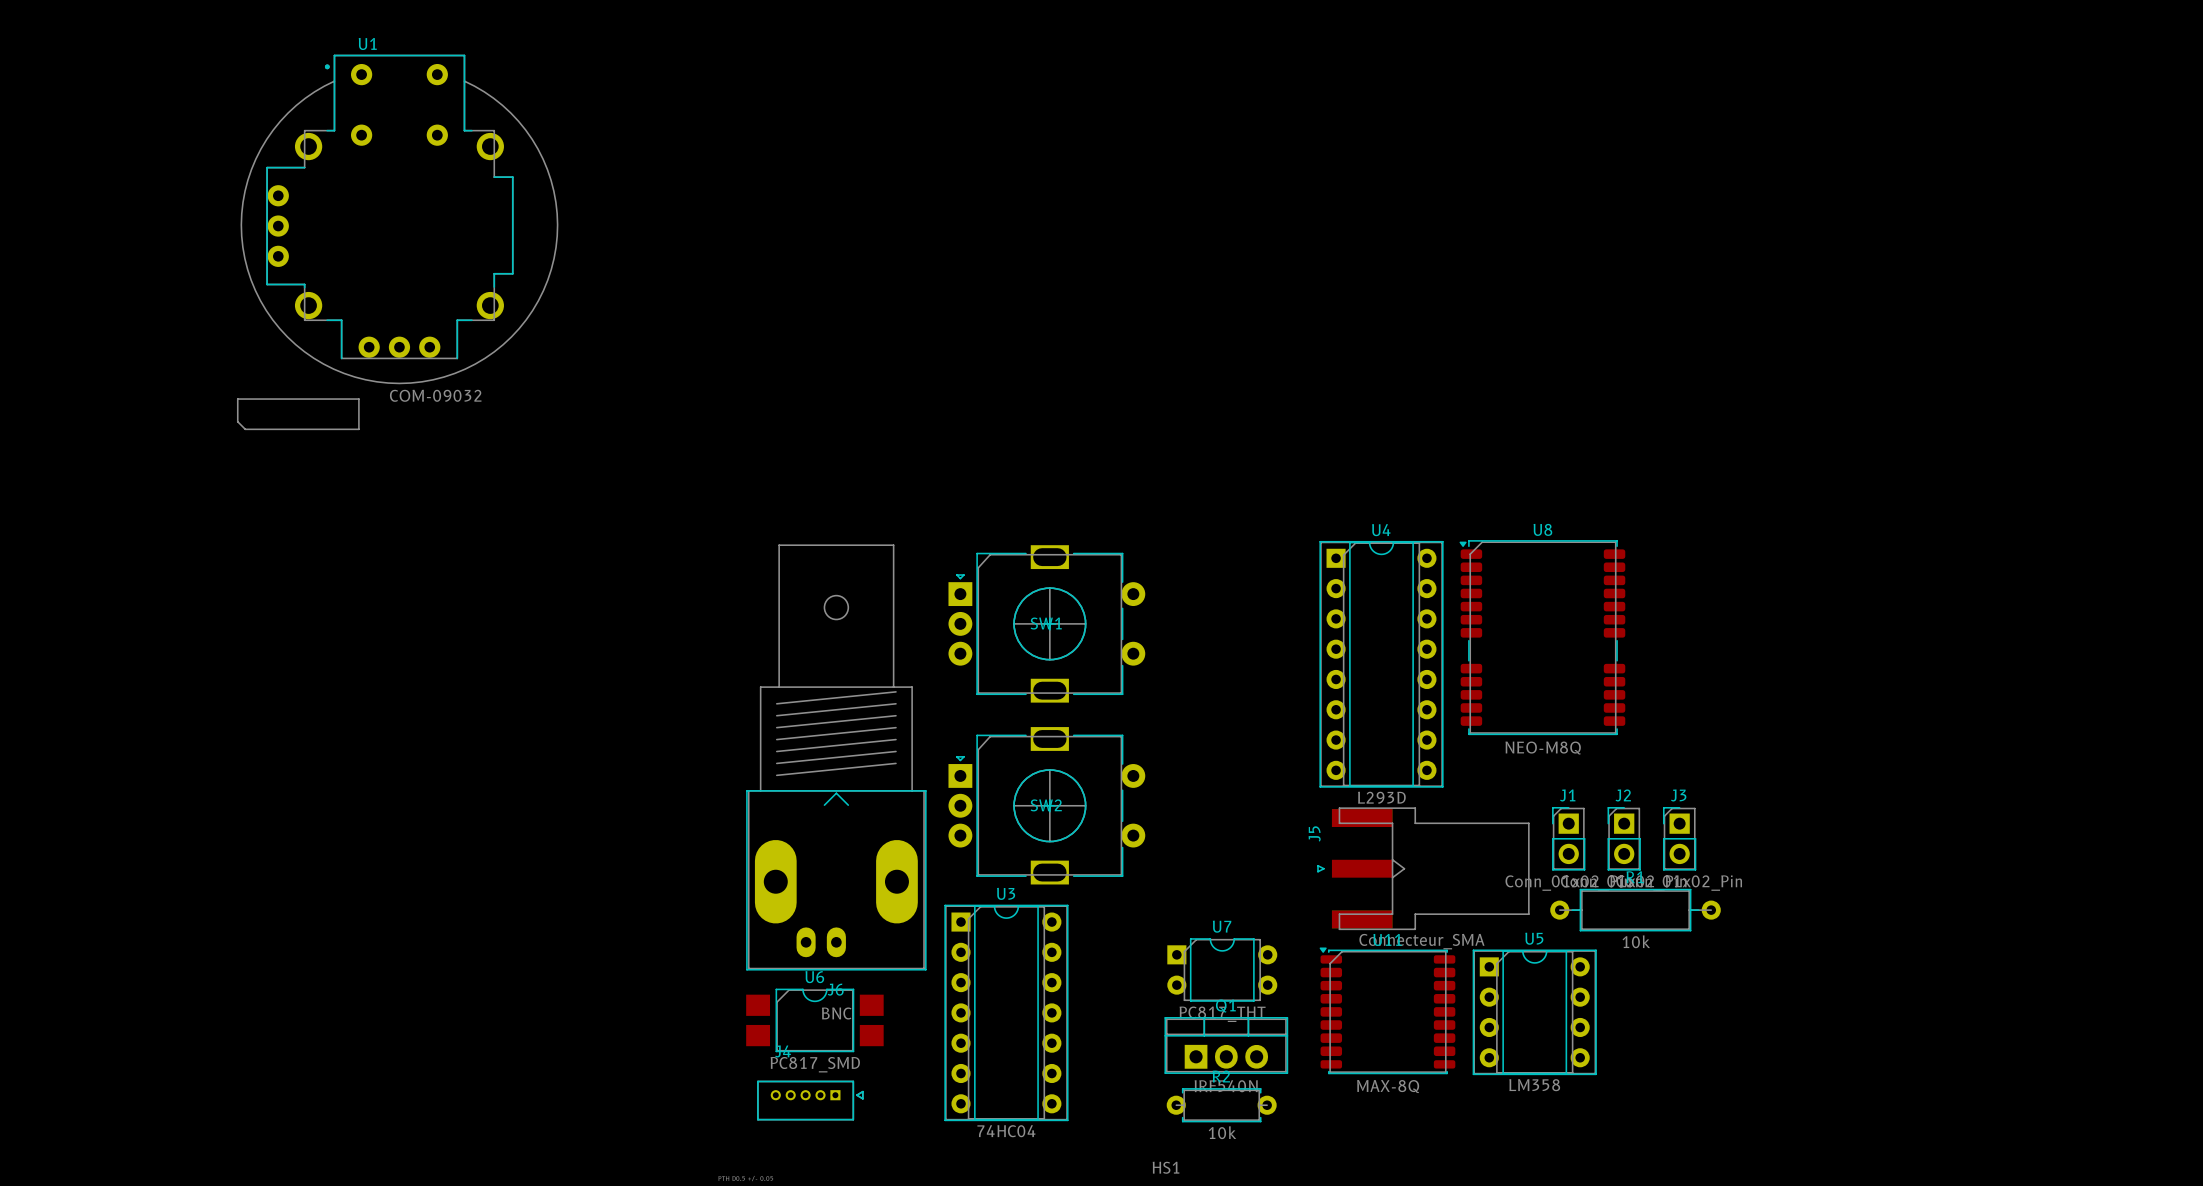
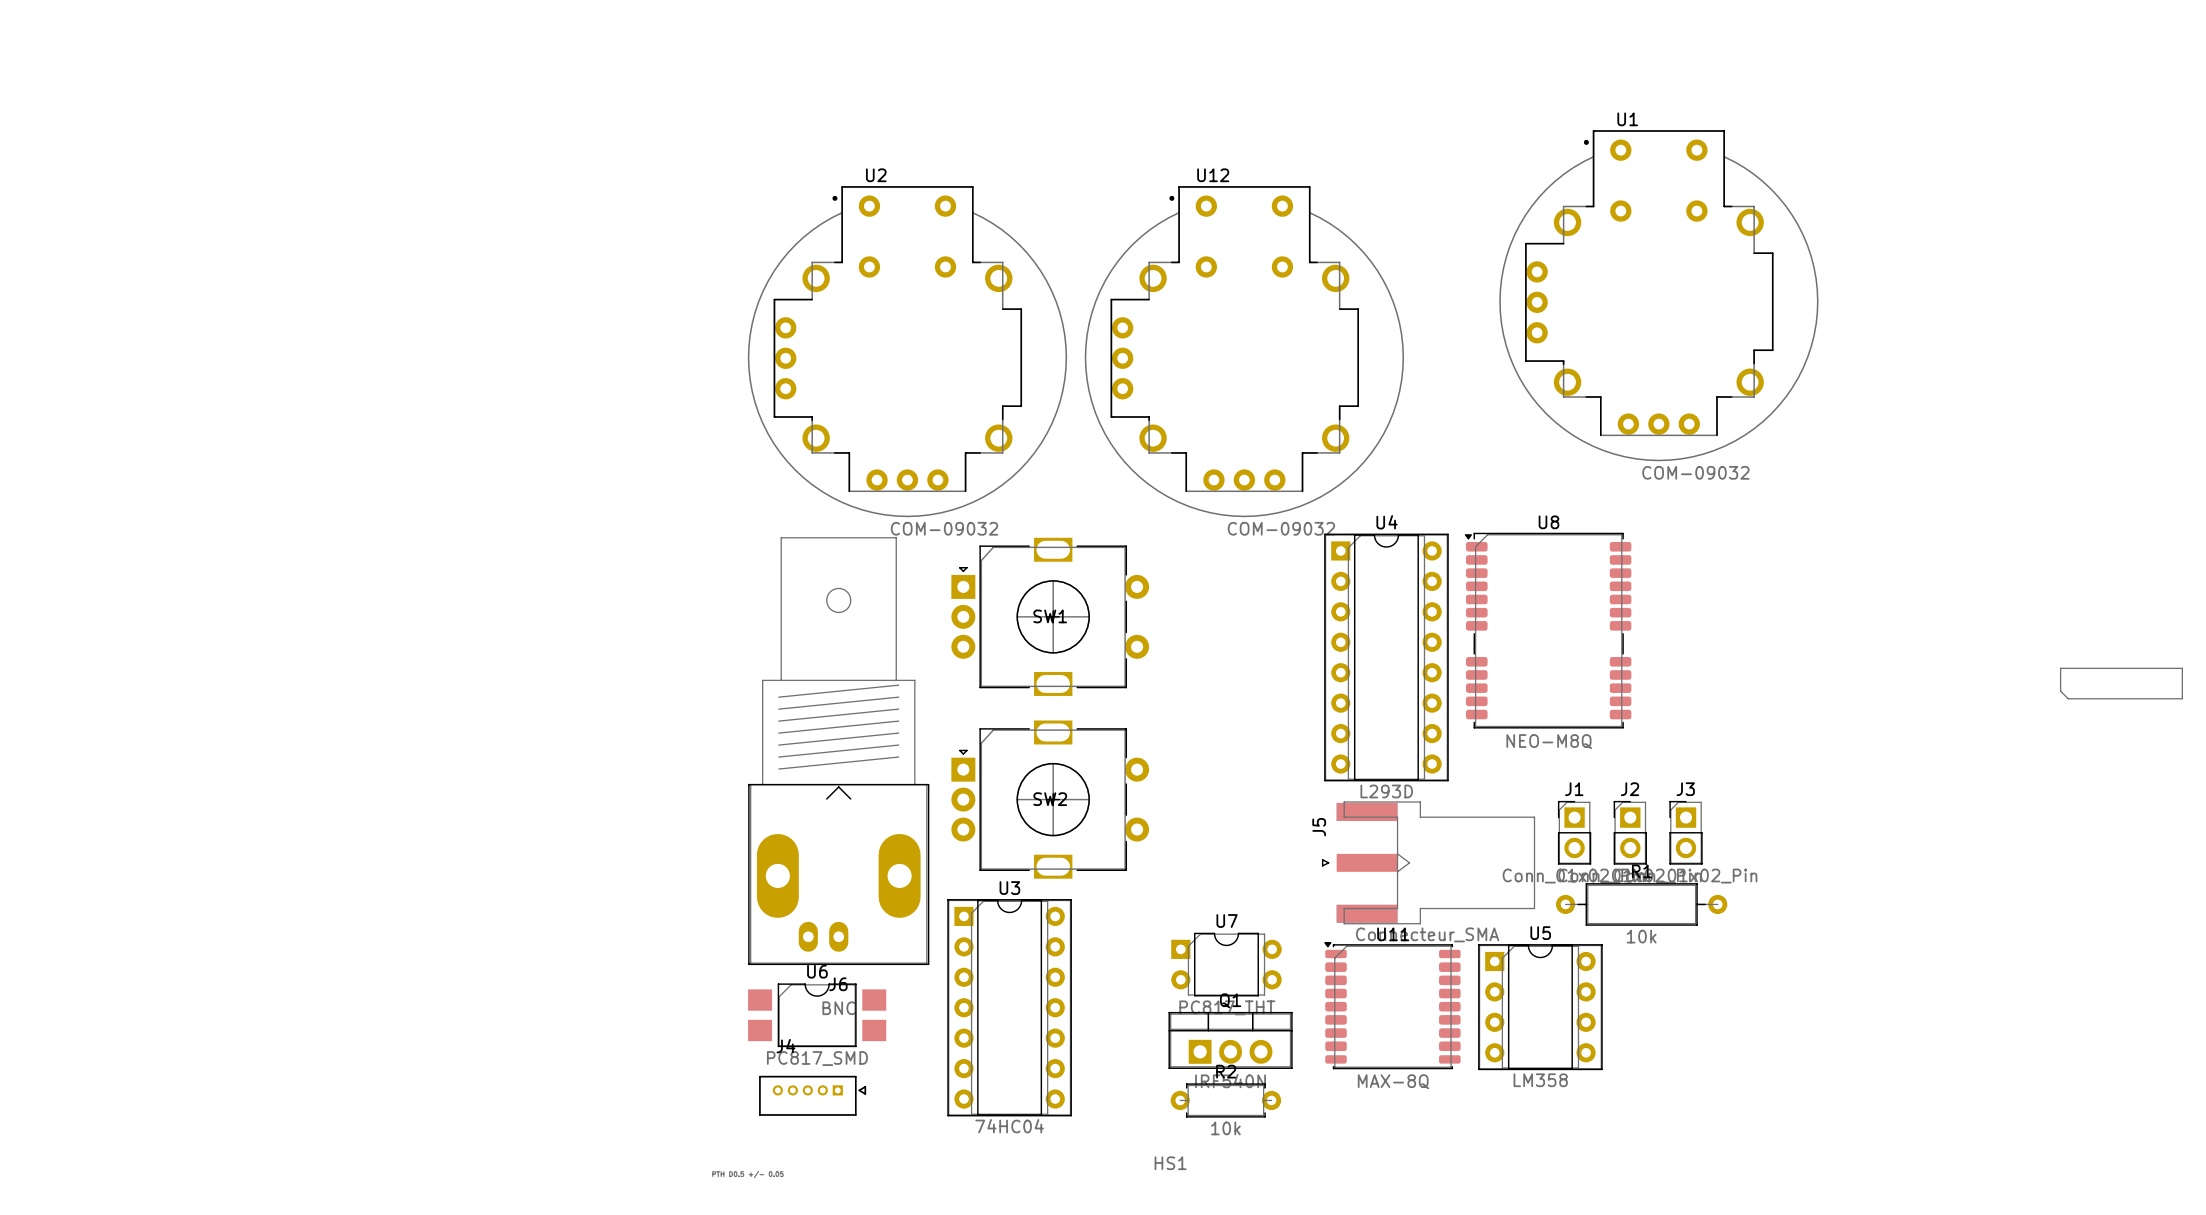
U1 position: (399, 219) -> (1658, 295)
U2: none -> COM-09032 (907, 351)
U12: none -> COM-09032 (1244, 351)
drawing: [237, 398, 360, 430] -> none
drawing: none -> [2060, 667, 2183, 700]

